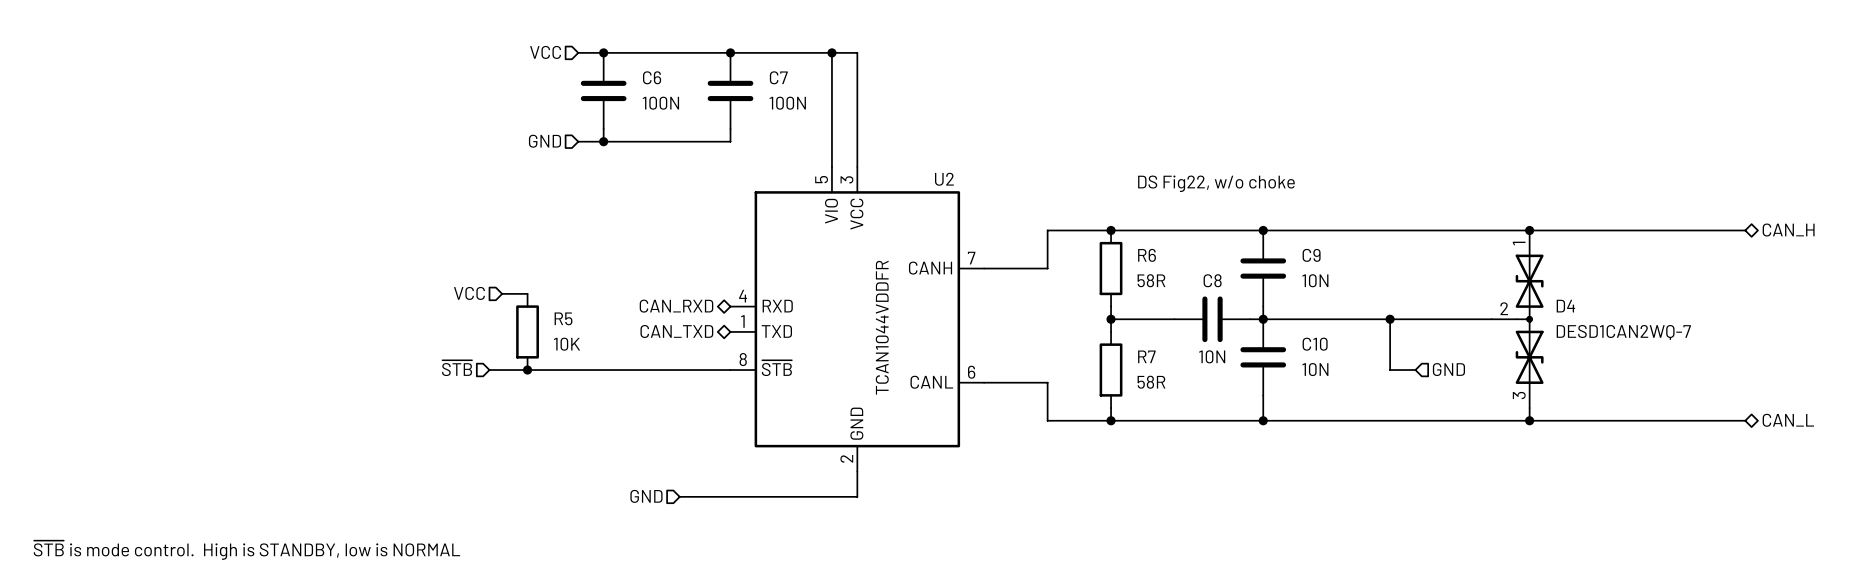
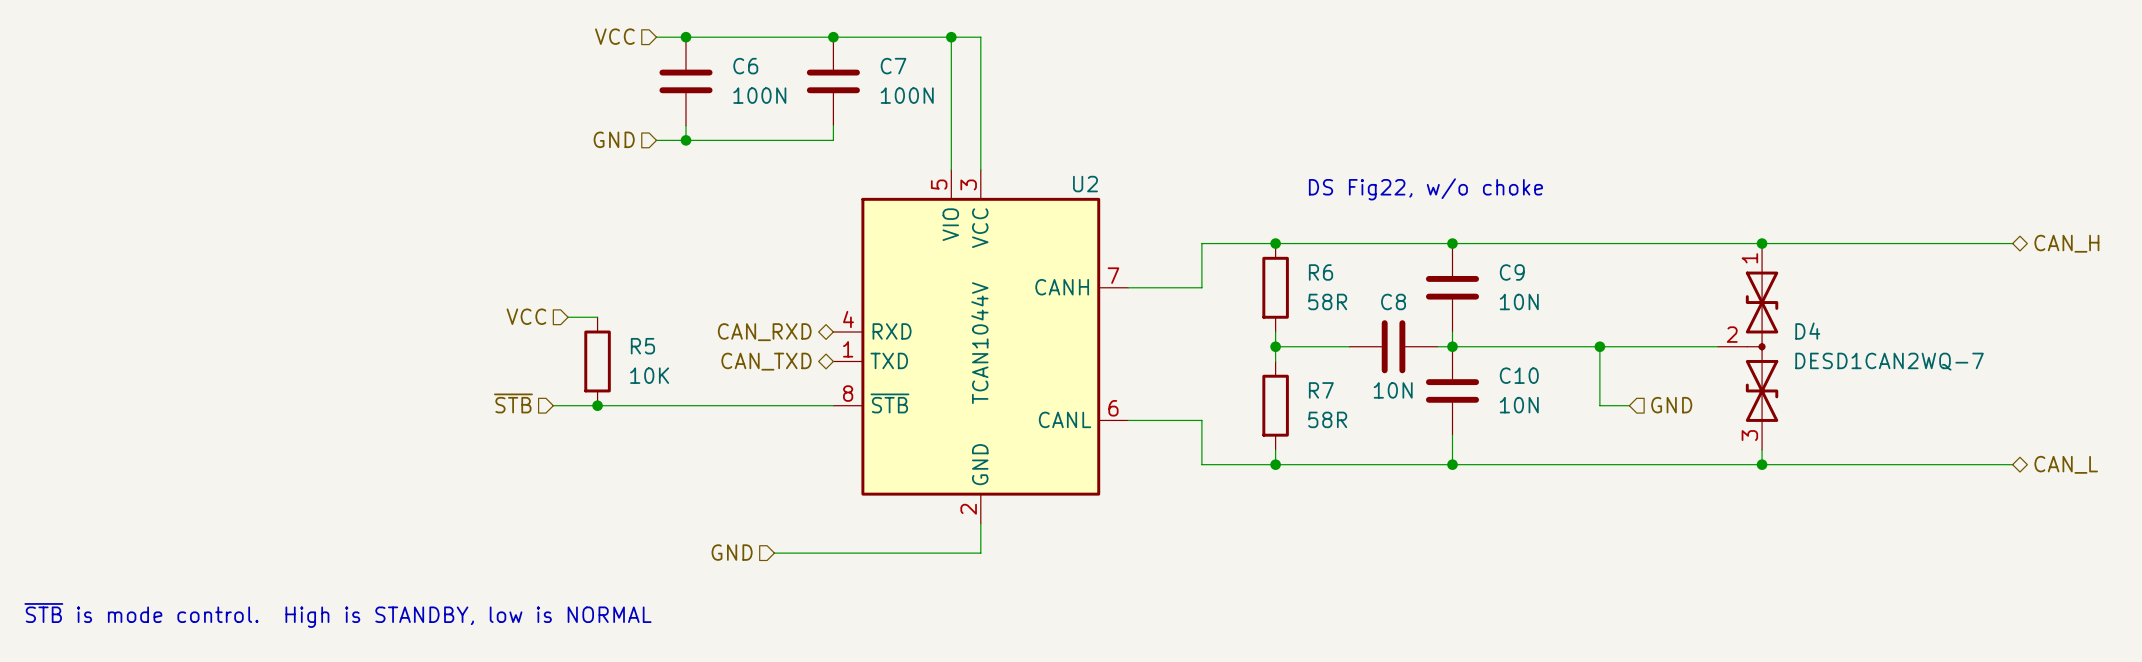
U2 value: TCAN1044VDDFR (882, 327) -> TCAN1044V (979, 343)

